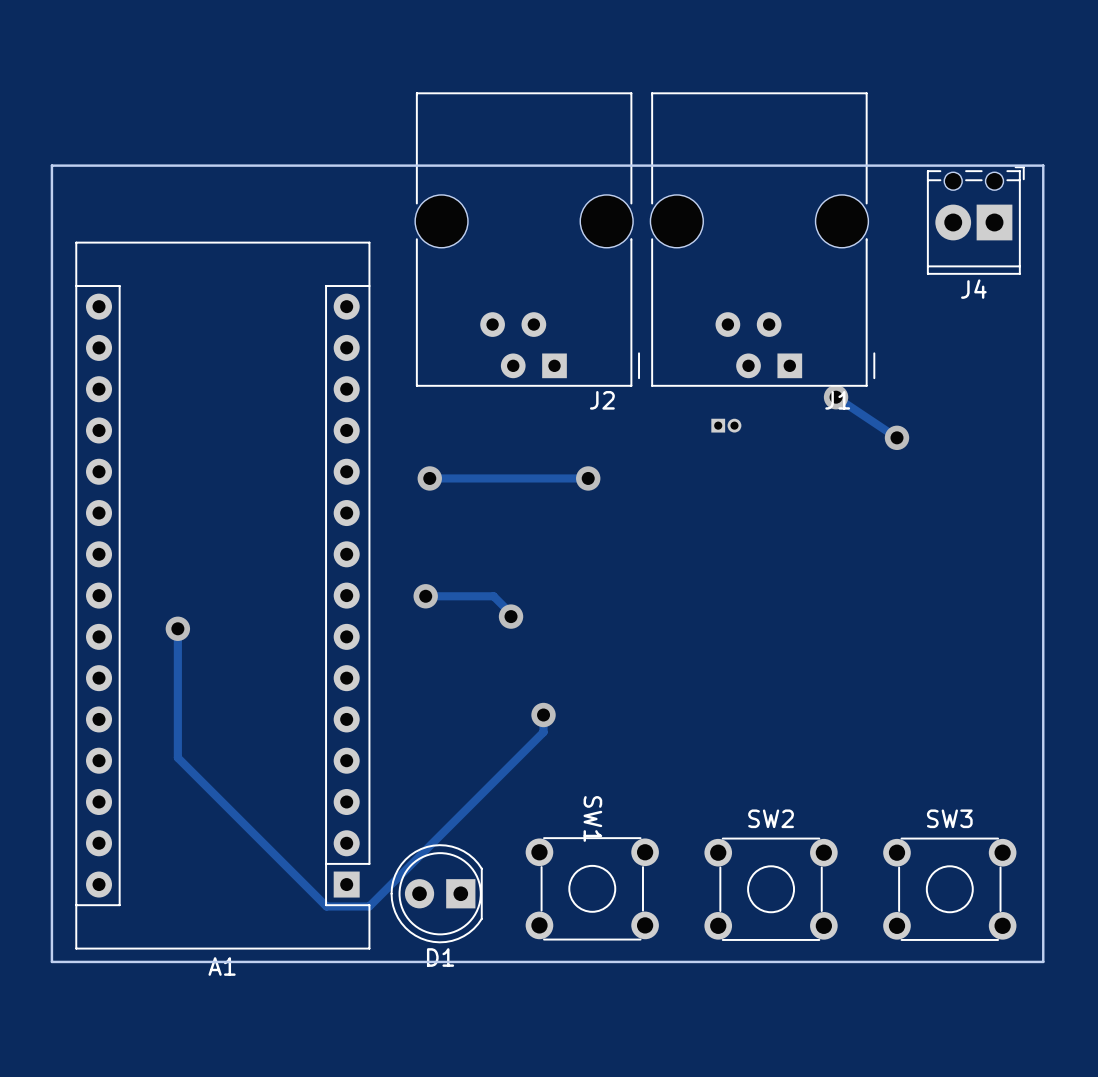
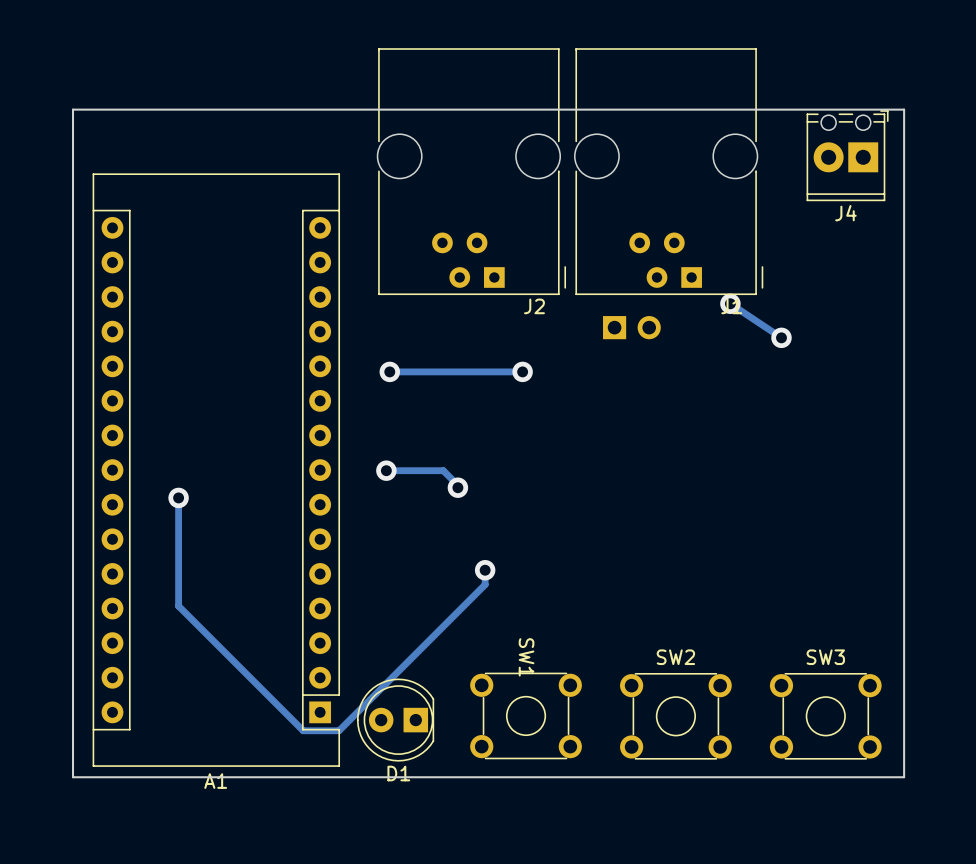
part footprint: [711, 418, 742, 433] -> [603, 316, 661, 340]

